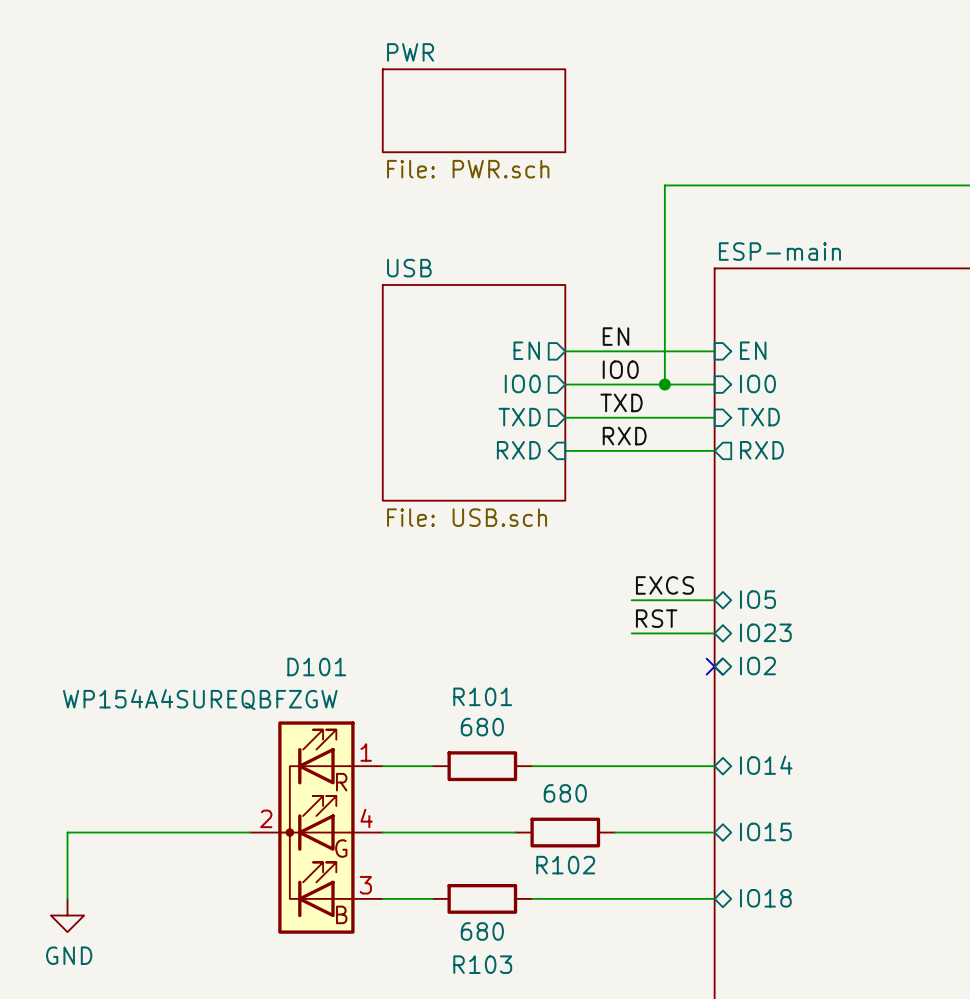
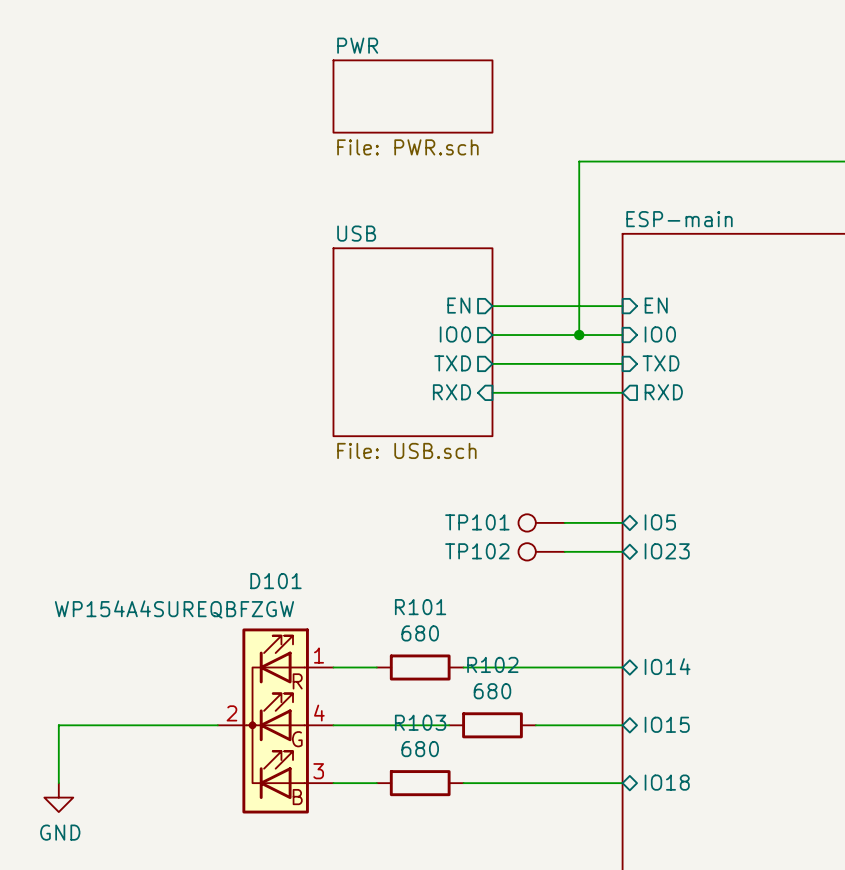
label: EN (615, 336) -> none
label: IO0 (620, 369) -> none
label: TXD (621, 402) -> none
label: RXD (624, 436) -> none
label: EXCS (664, 585) -> none
TP101: none -> (541, 522)
label: RST (656, 618) -> none
TP102: none -> (541, 551)
no-connect mark: (714, 666) -> none
sheet pin: IO2 (757, 666) -> none
R102 name position: R102 (565, 865) -> R102 (492, 664)
R103 value position: 680 (482, 931) -> 680 (420, 749)
R103 name position: R103 (482, 964) -> R103 (420, 722)

